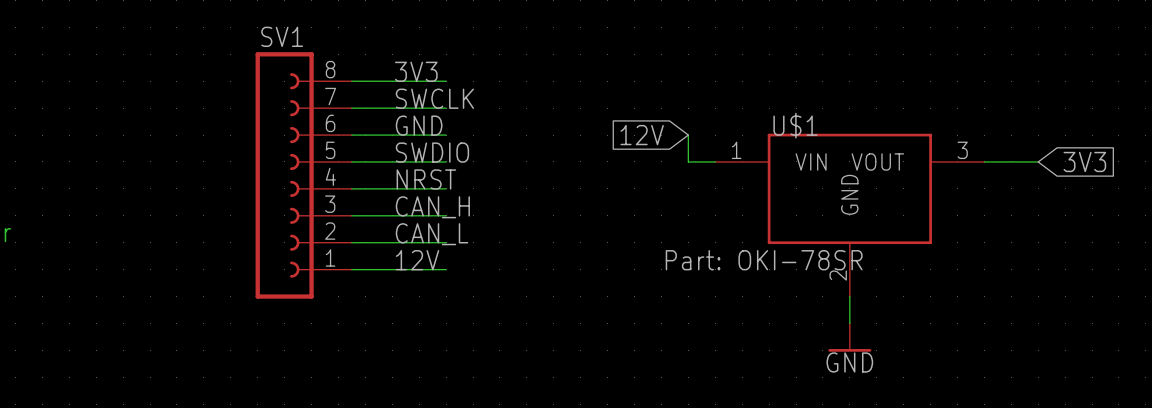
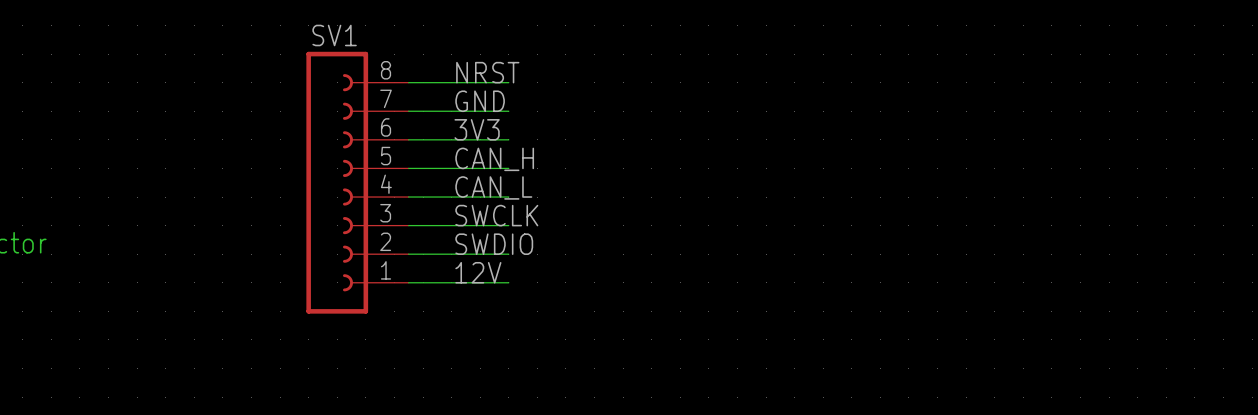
label: 3V3 (416, 71) -> NRST (487, 72)
label: SWCLK (434, 98) -> GND (480, 101)
label: GND (419, 125) -> 3V3 (477, 129)
global label: 12V (642, 135) -> none
wire: (688, 135) (688, 161) (715, 161) -> none
label: SWDIO (432, 152) -> CAN_H (494, 159)
wire: (984, 161) (1038, 161) -> none
global label: 3V3 (1084, 161) -> none
label: NRST (426, 179) -> CAN_L (493, 187)
label: CAN_H (432, 207) -> SWCLK (496, 215)
U$1: (849, 215) -> none
label: CAN_L (432, 234) -> SWDIO (494, 244)
wire: (849, 296) (849, 323) -> none
power symbol: GND (849, 337) -> none

